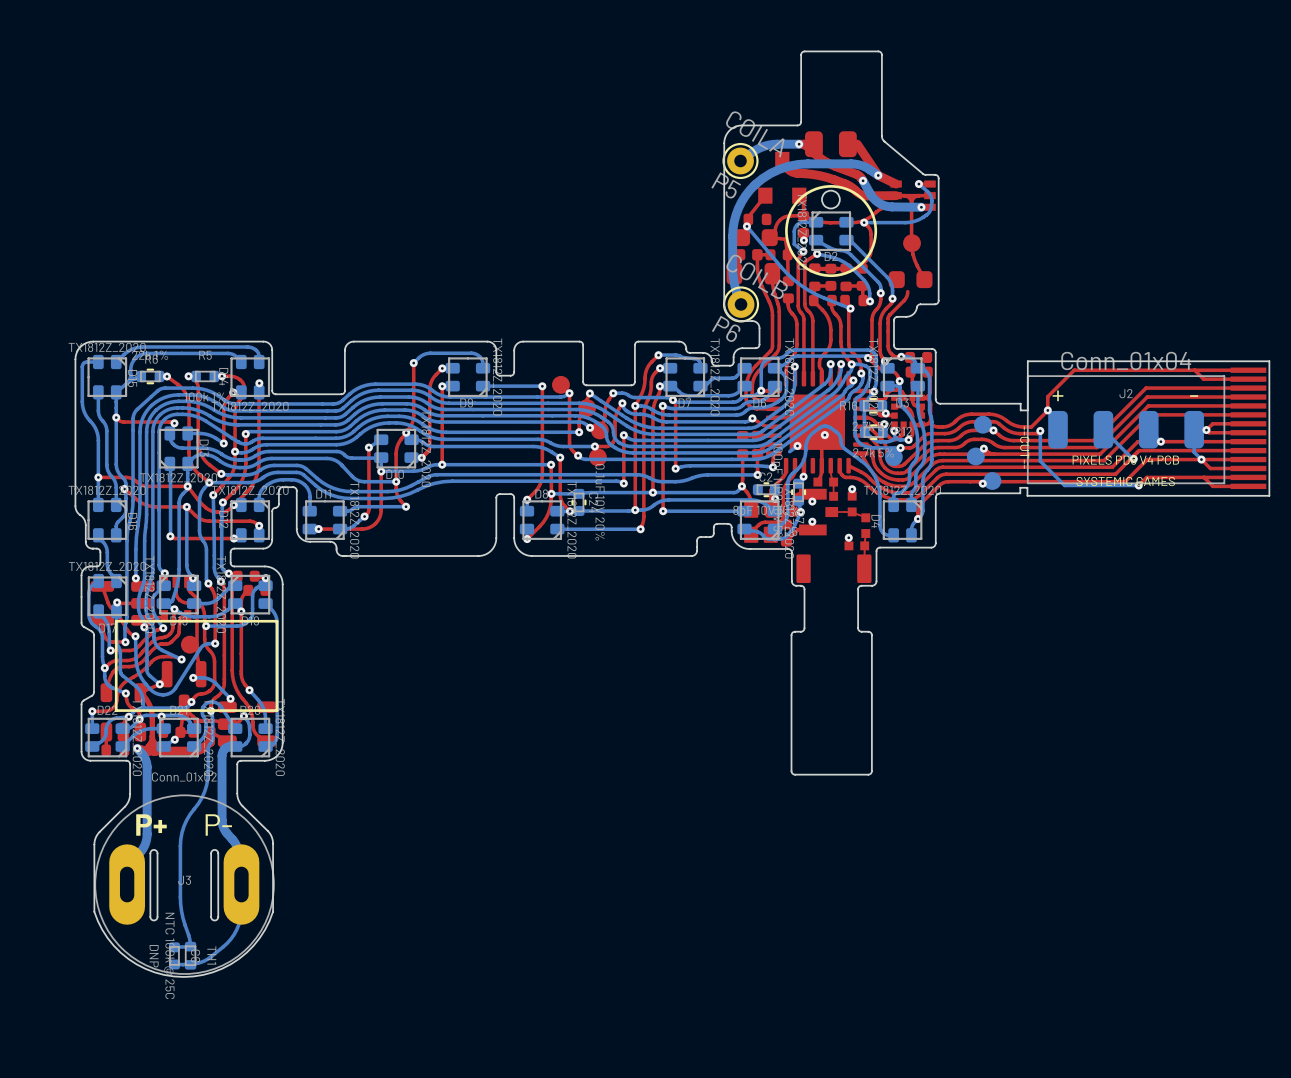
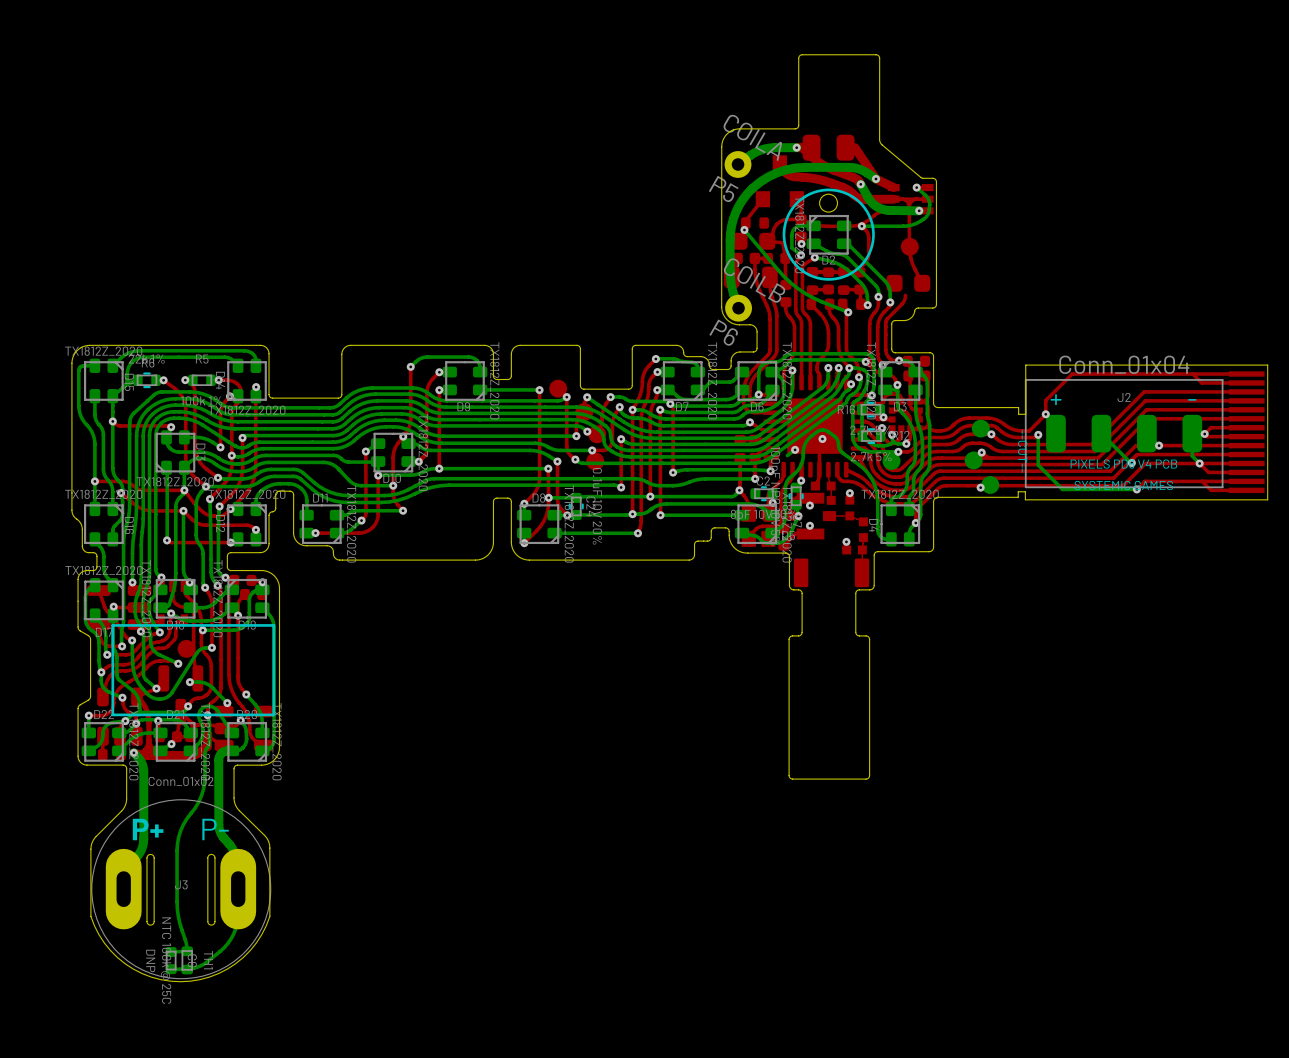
P5 footprint: [722, 142, 759, 180] -> [724, 151, 752, 178]
P6 footprint: [723, 286, 760, 323] -> [725, 294, 752, 322]

